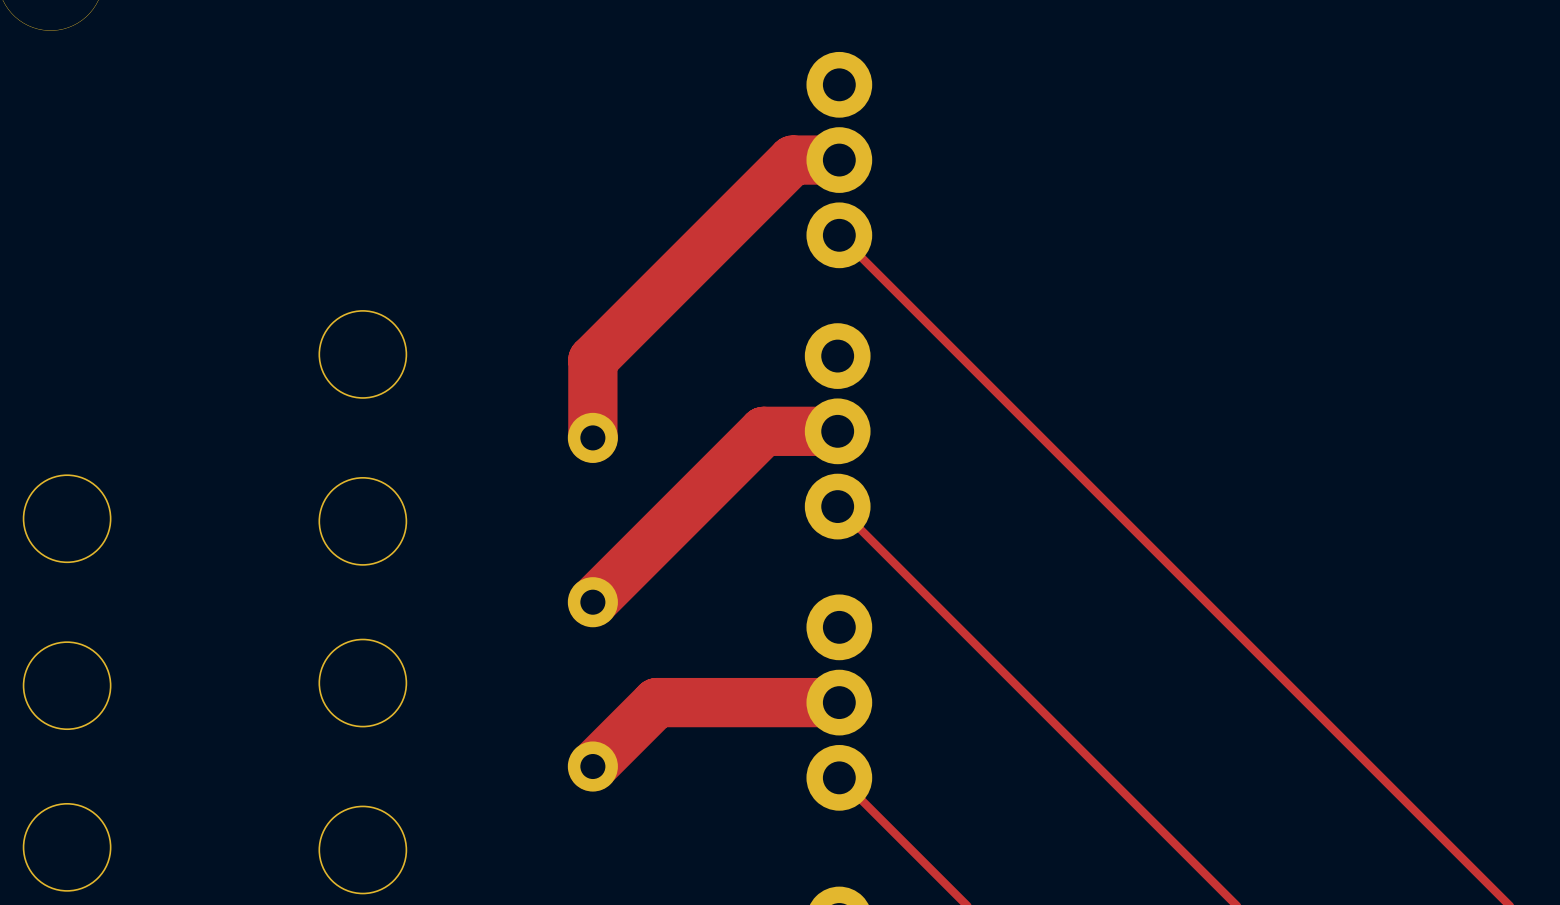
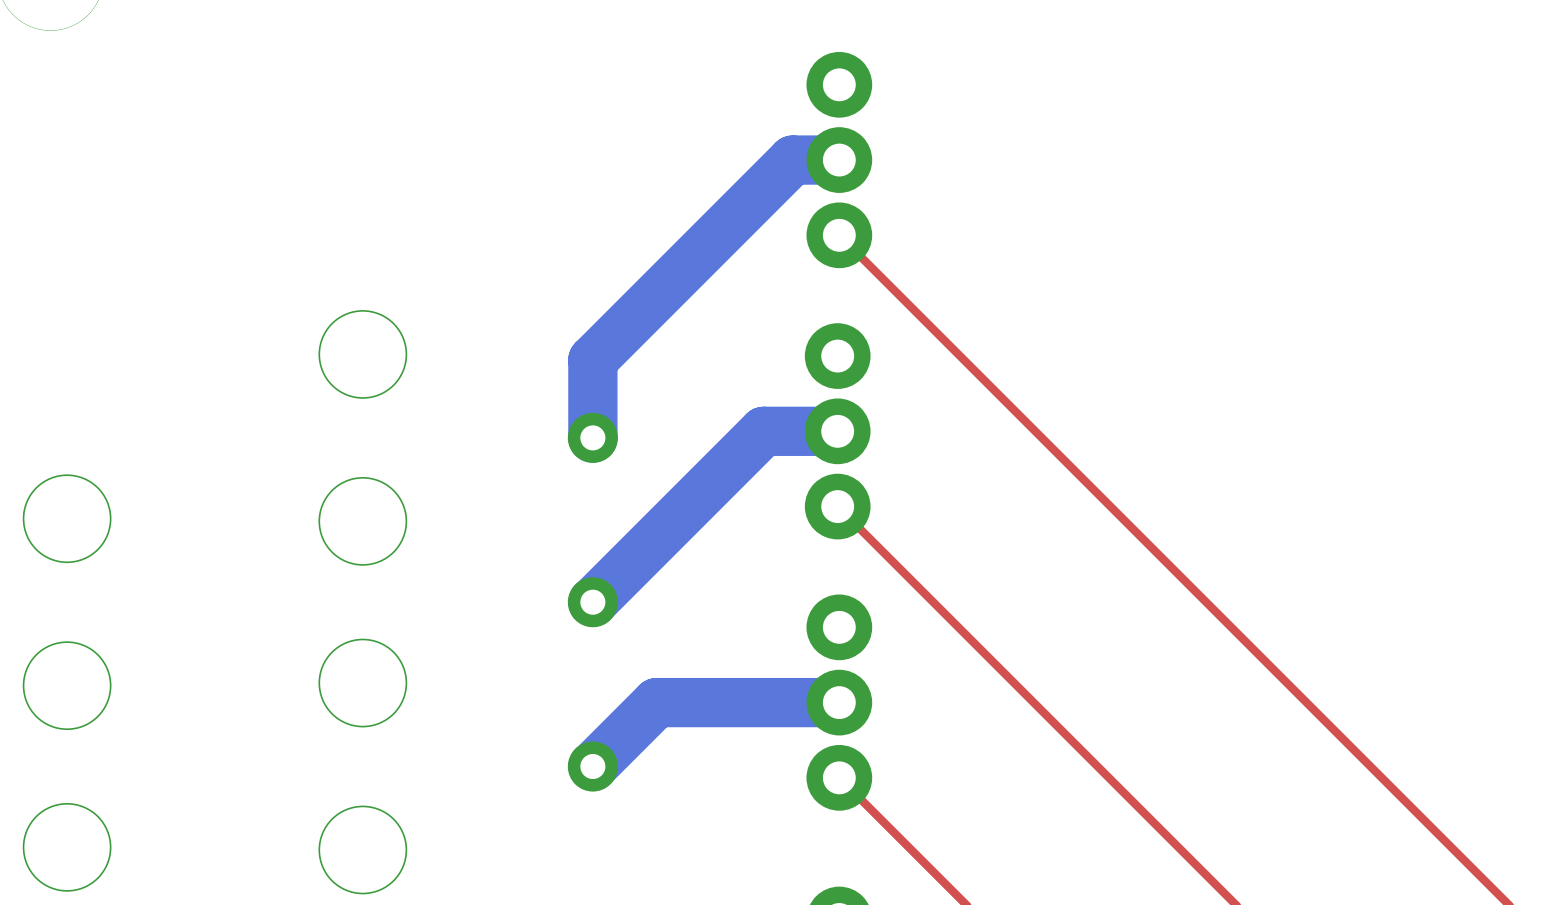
top track: (839, 160) (792, 160) (592, 360) (592, 437) -> none
bottom track: none -> (839, 160) (792, 160) (592, 360) (592, 437)
top track: (837, 431) (763, 431) (592, 602) -> none
bottom track: none -> (837, 431) (763, 431) (592, 602)
top track: (839, 702) (656, 702) (592, 766) -> none
bottom track: none -> (839, 702) (656, 702) (592, 766)

